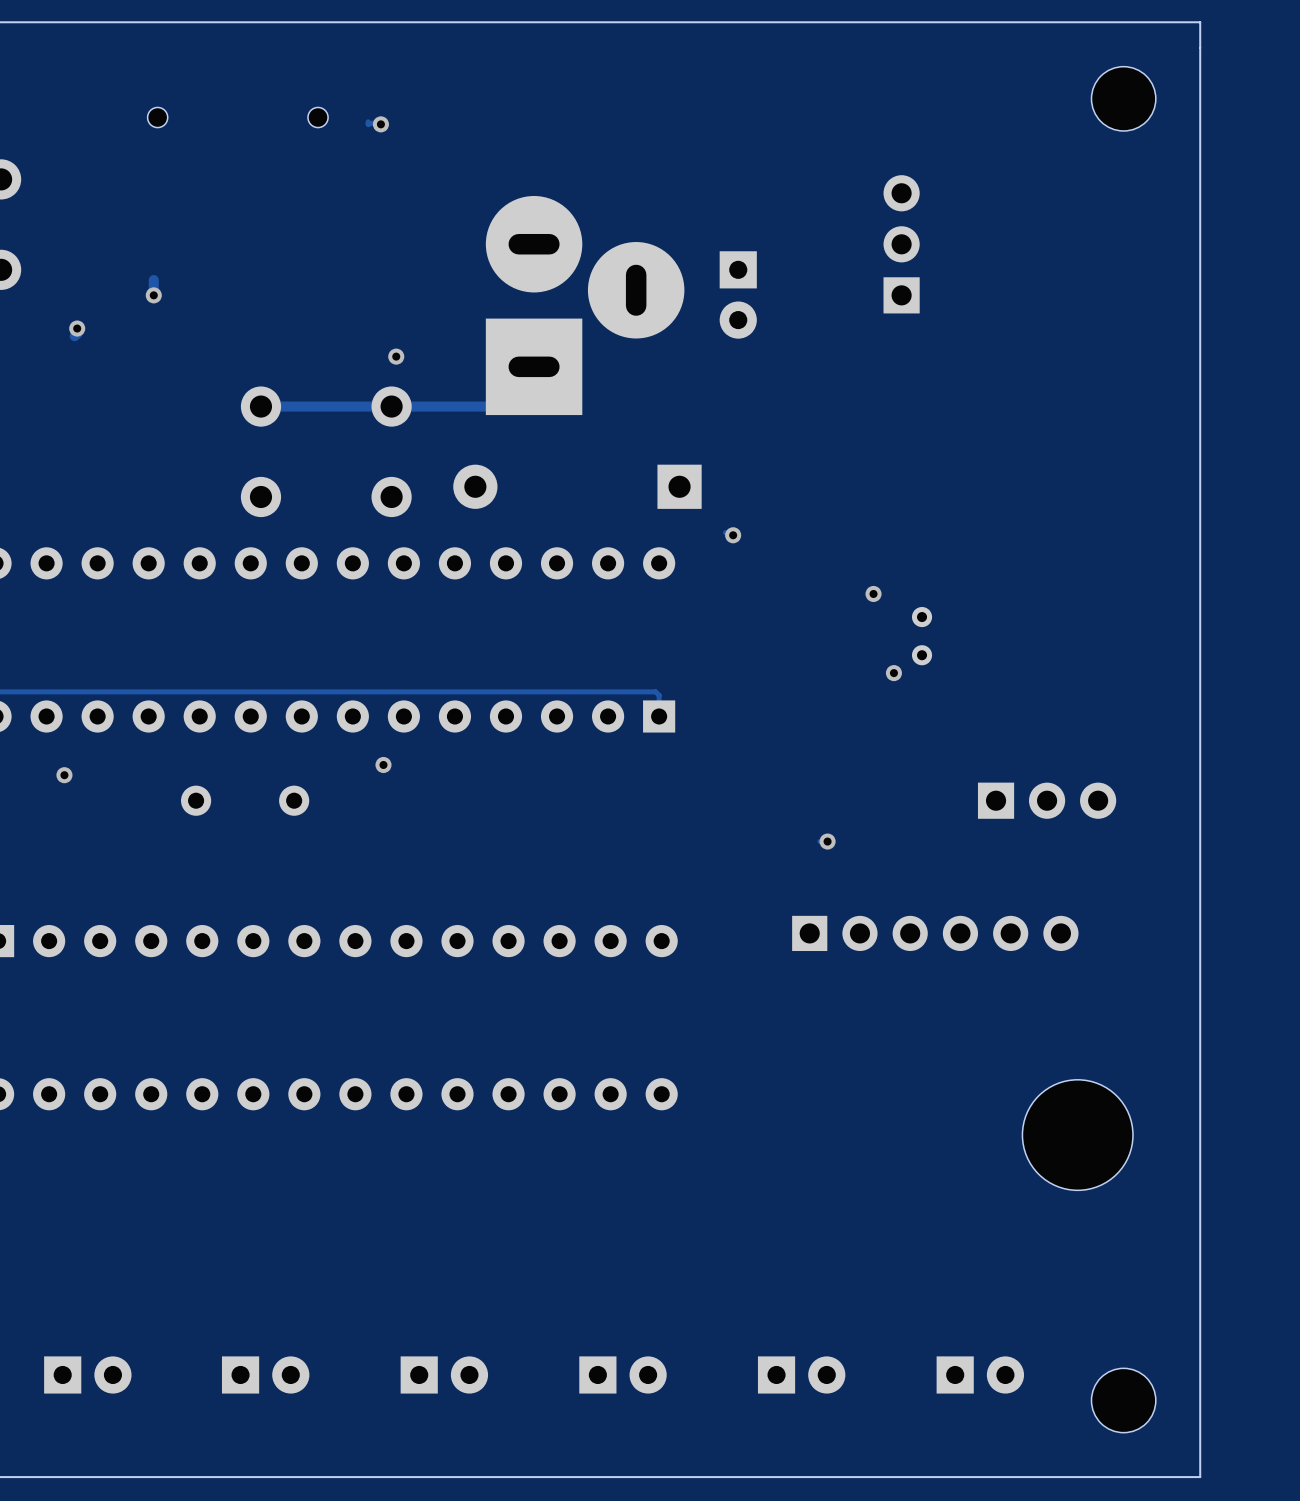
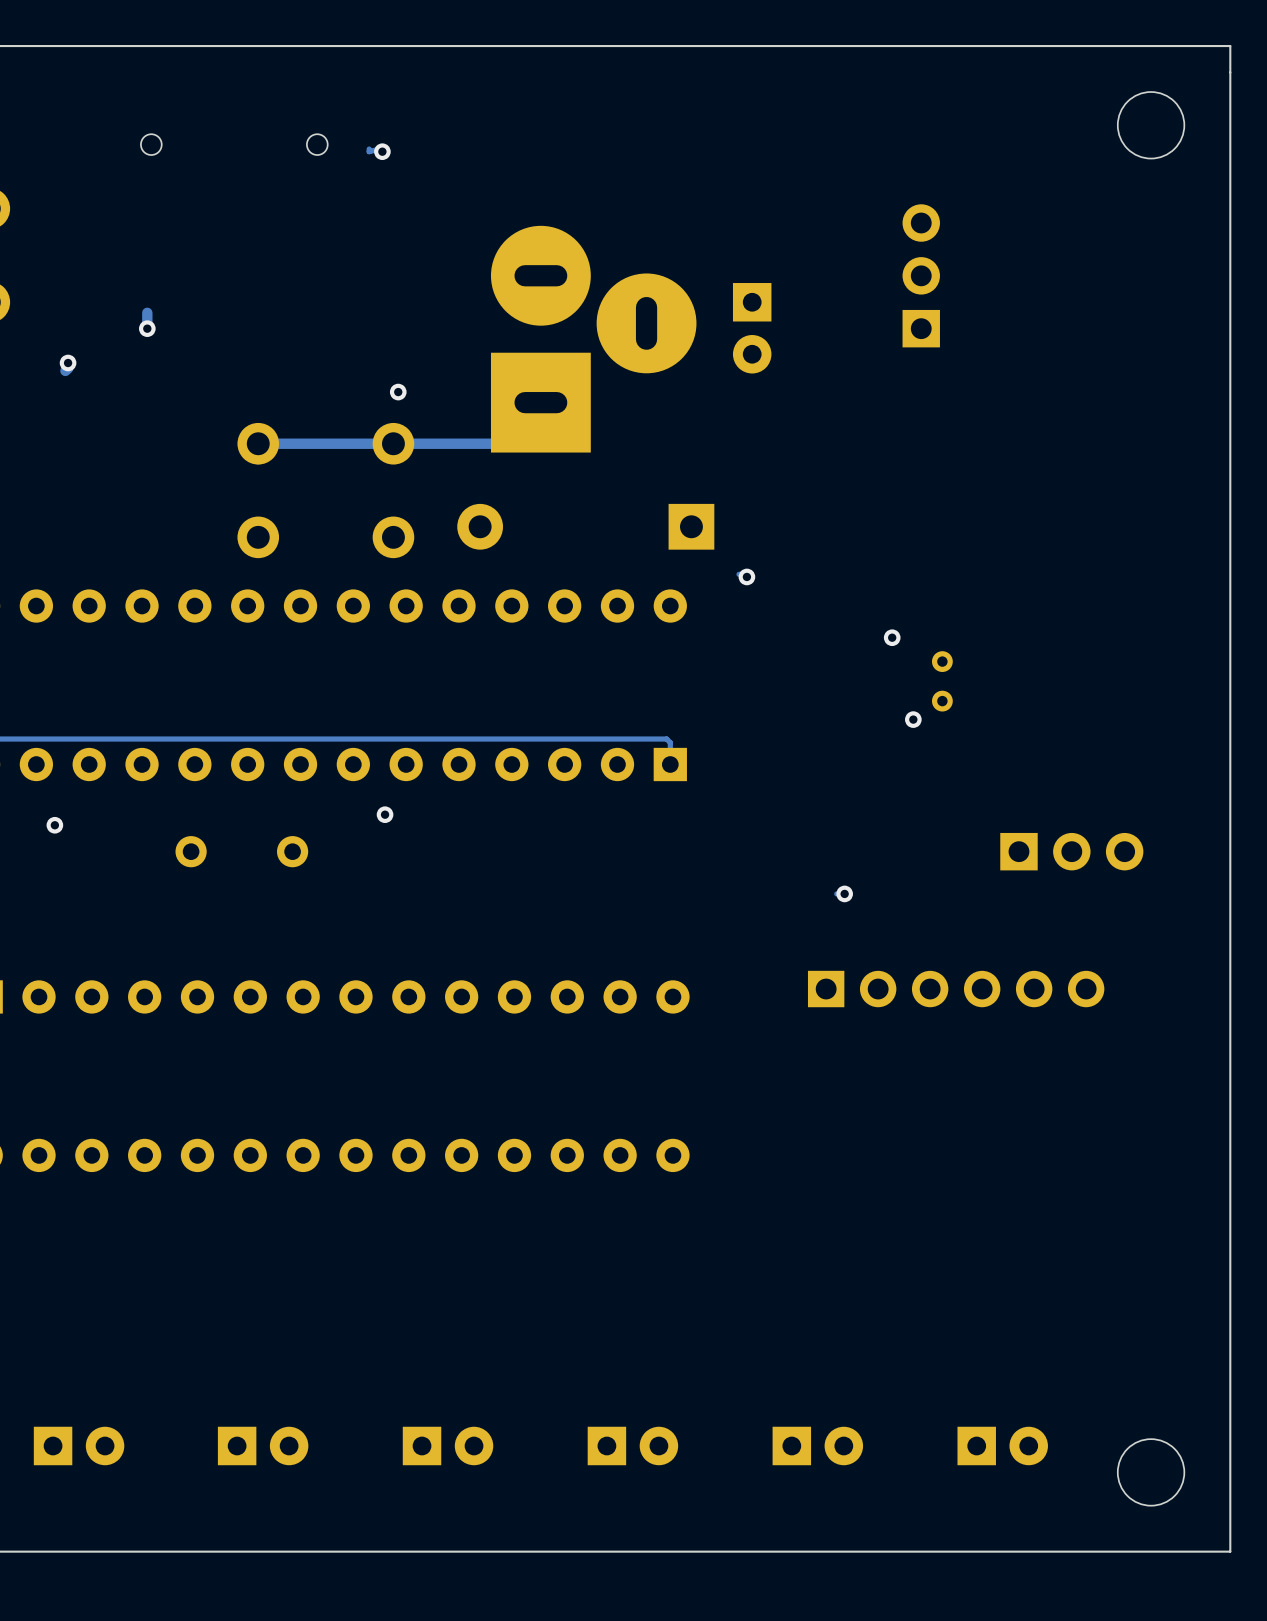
part: (1077, 1135) -> none

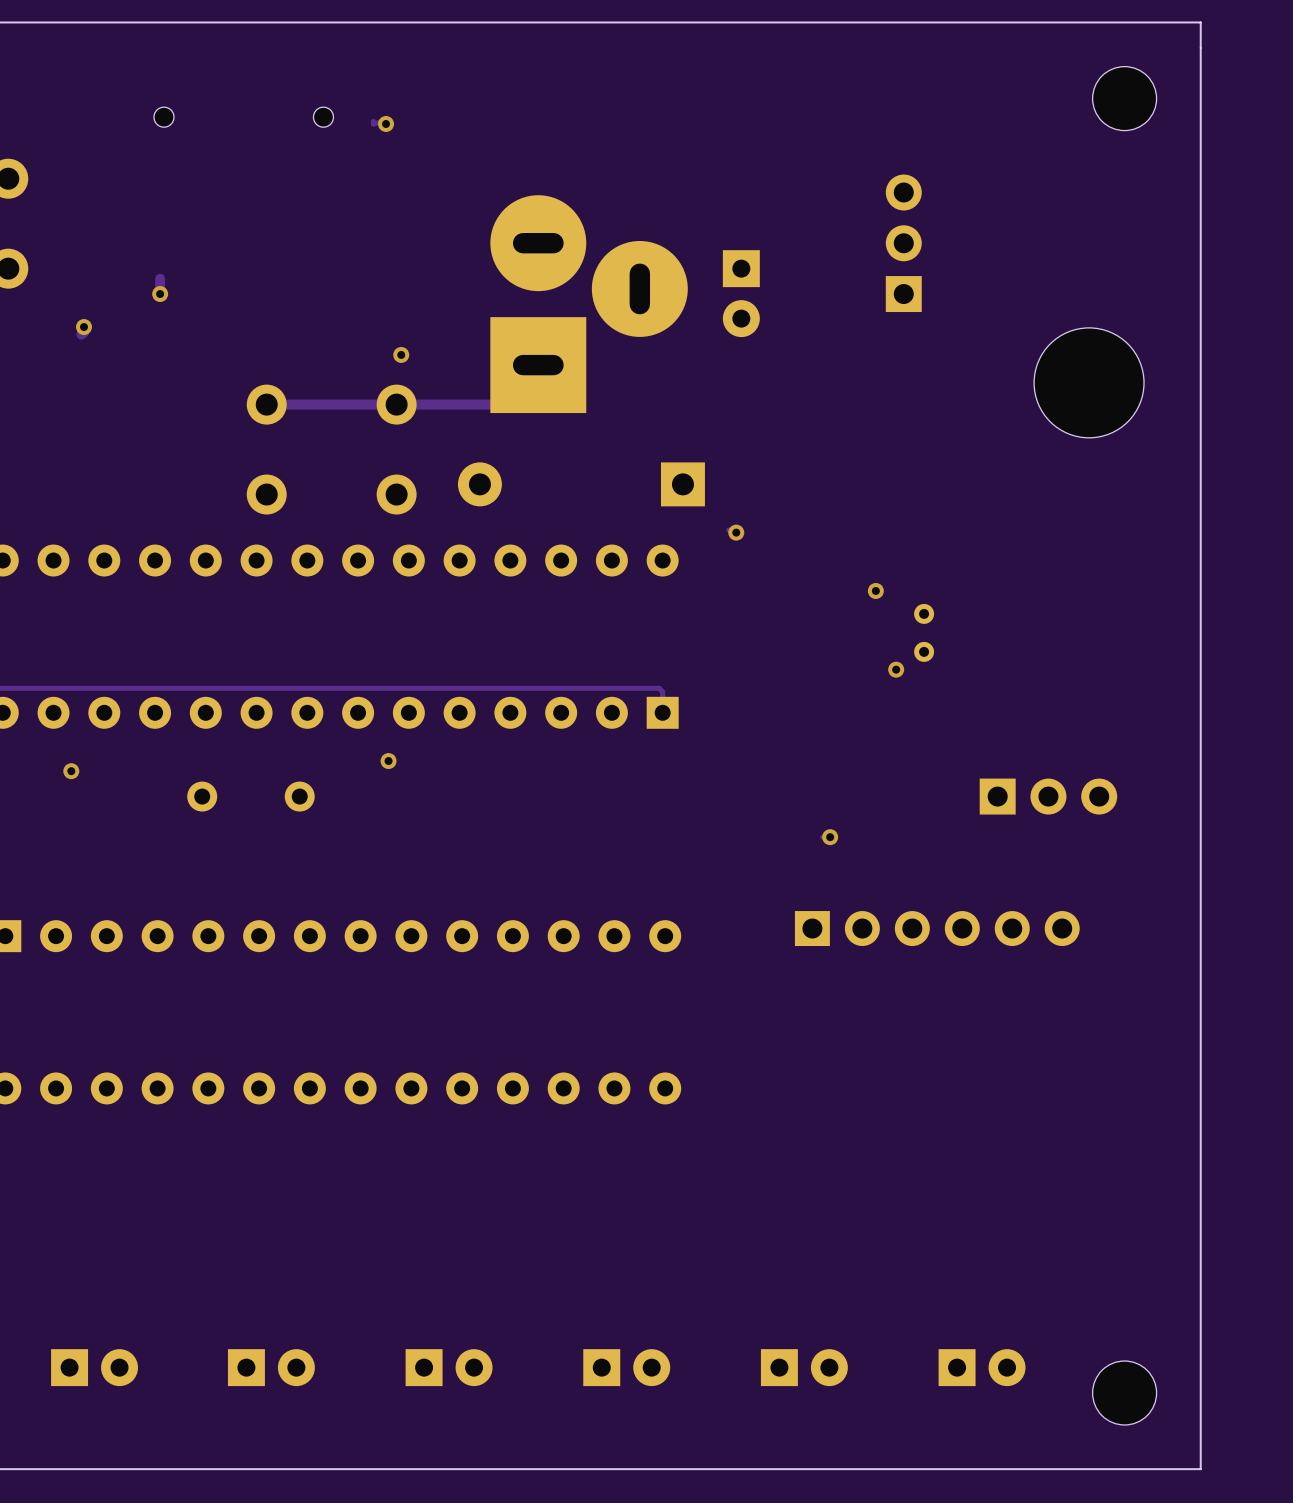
part: none -> (1089, 382)

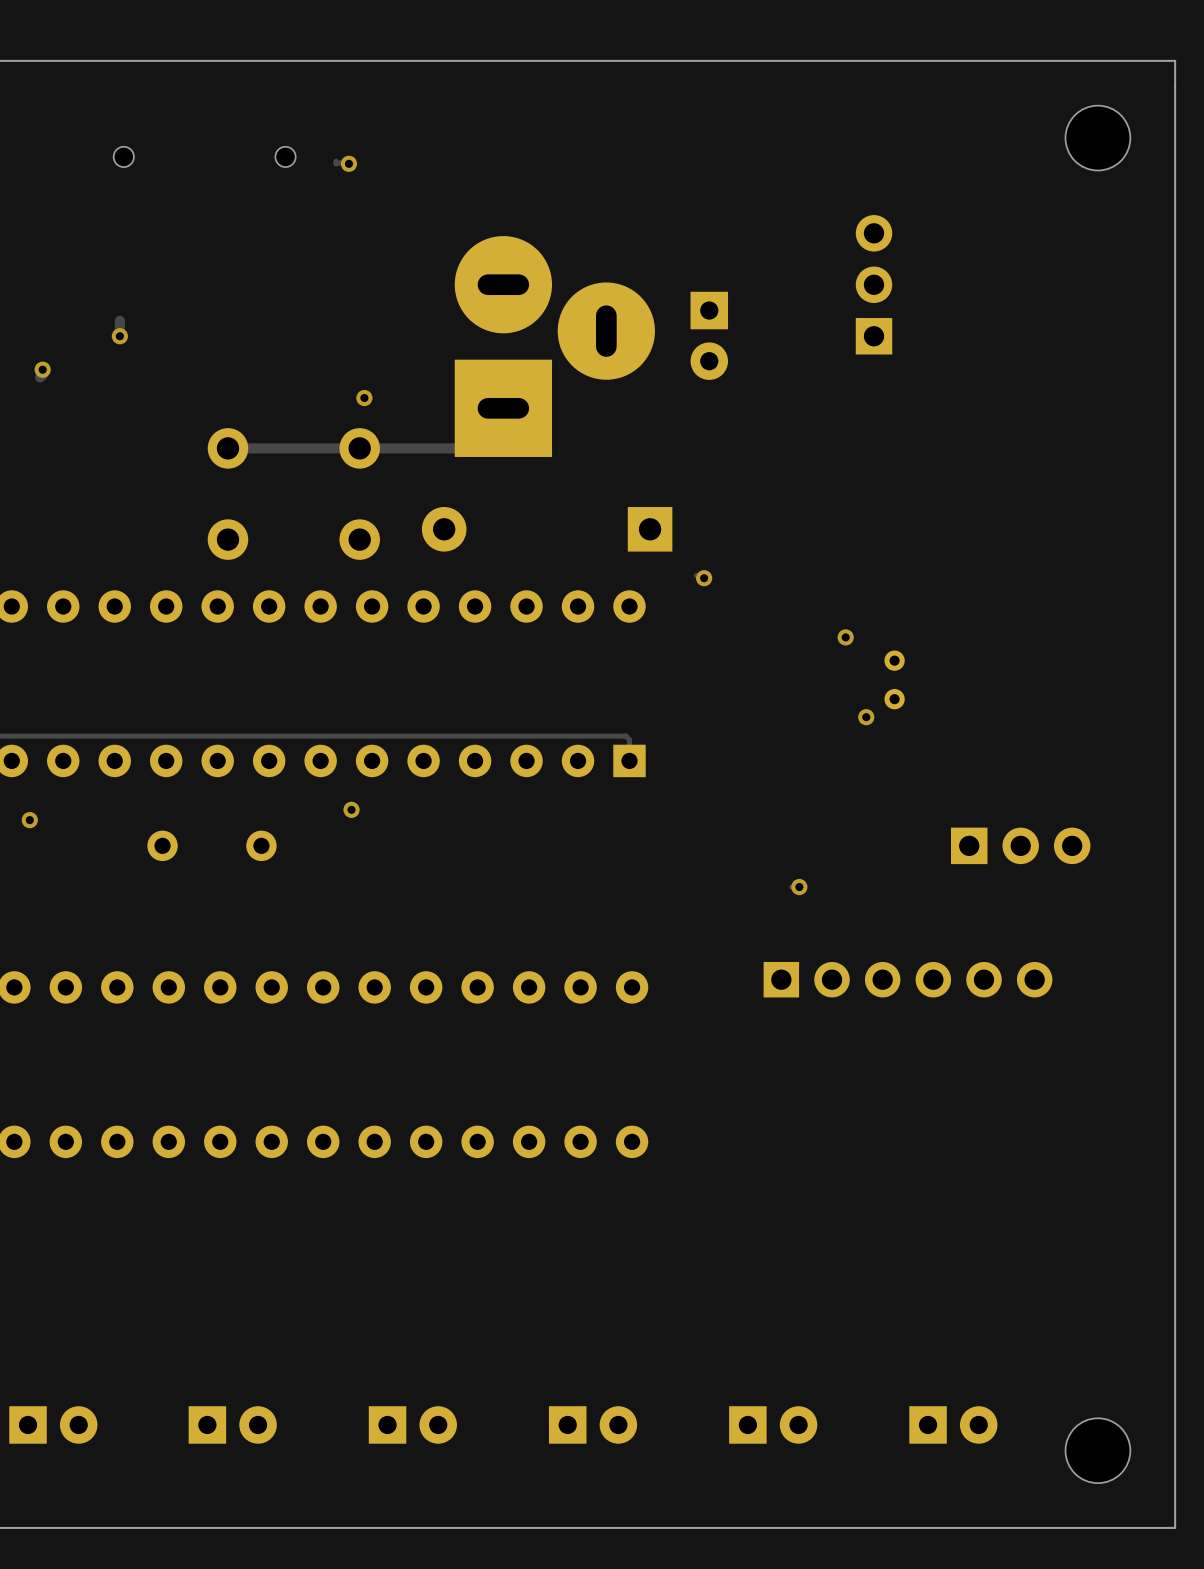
part: (1089, 382) -> none

